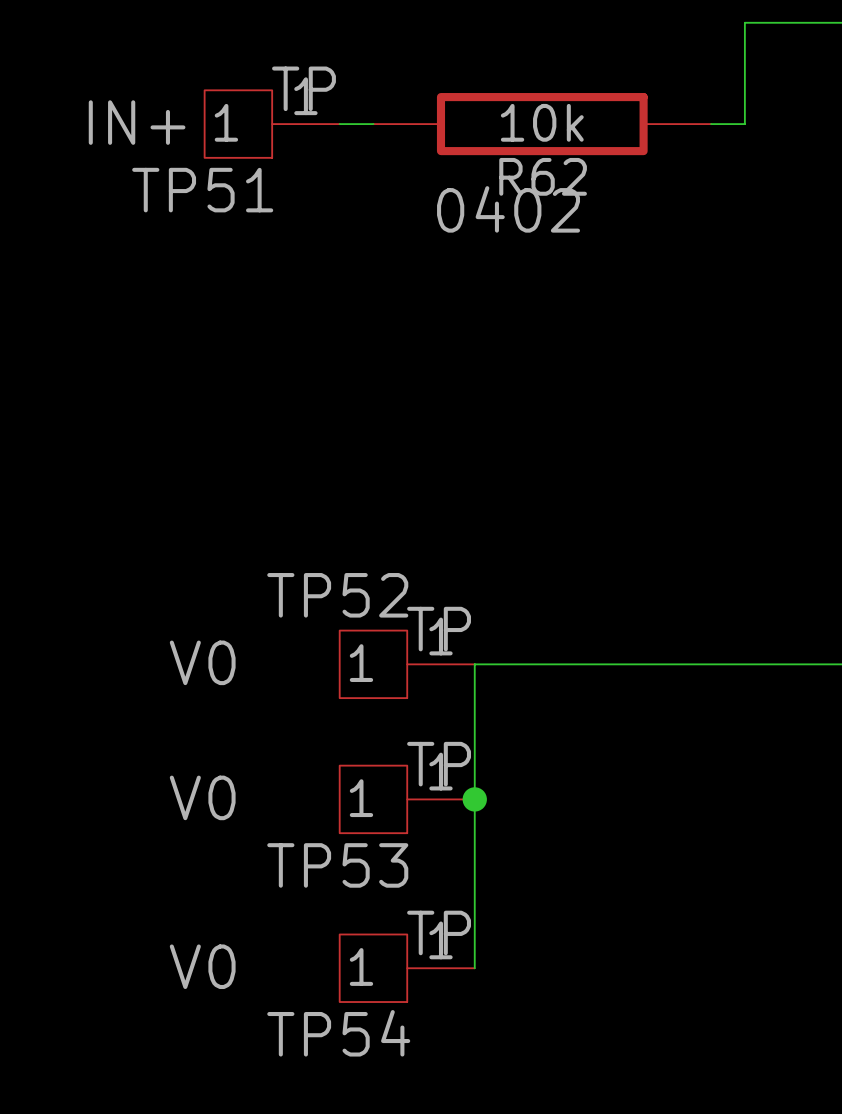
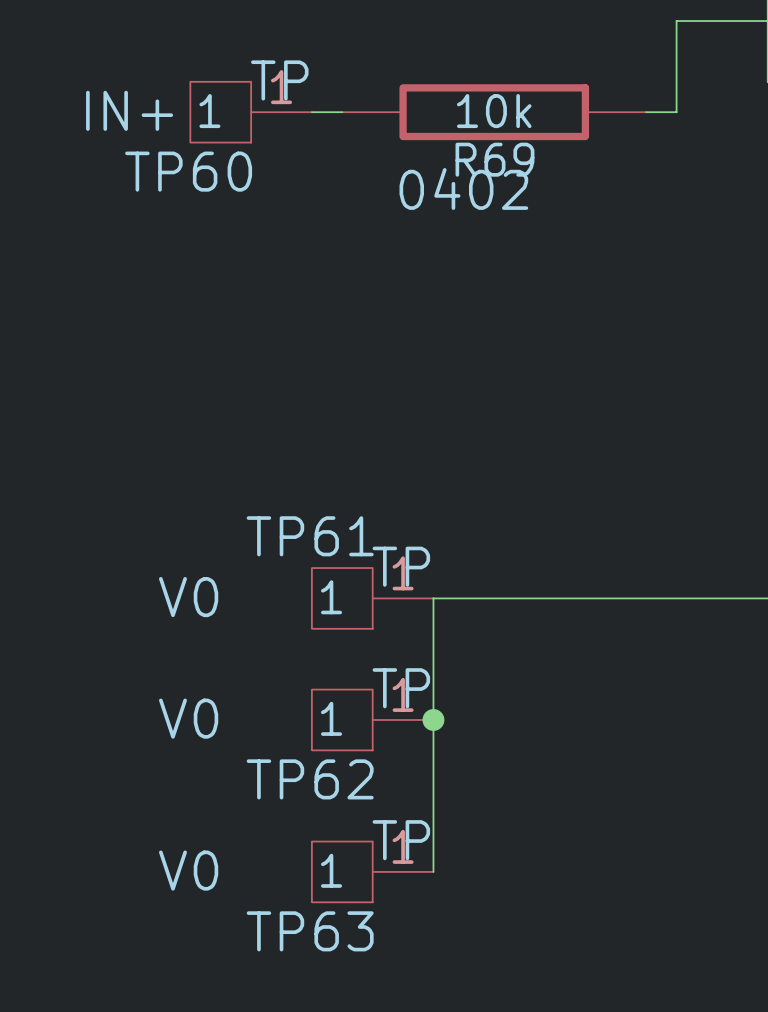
R62 name: R62 (543, 176) -> R69 (494, 159)
TP51 name: TP51 (202, 190) -> TP60 (188, 171)
TP52 name: TP52 (337, 595) -> TP61 (310, 536)
TP53 name: TP53 (337, 865) -> TP62 (310, 779)
TP54 name: TP54 (338, 1033) -> TP63 (310, 931)

